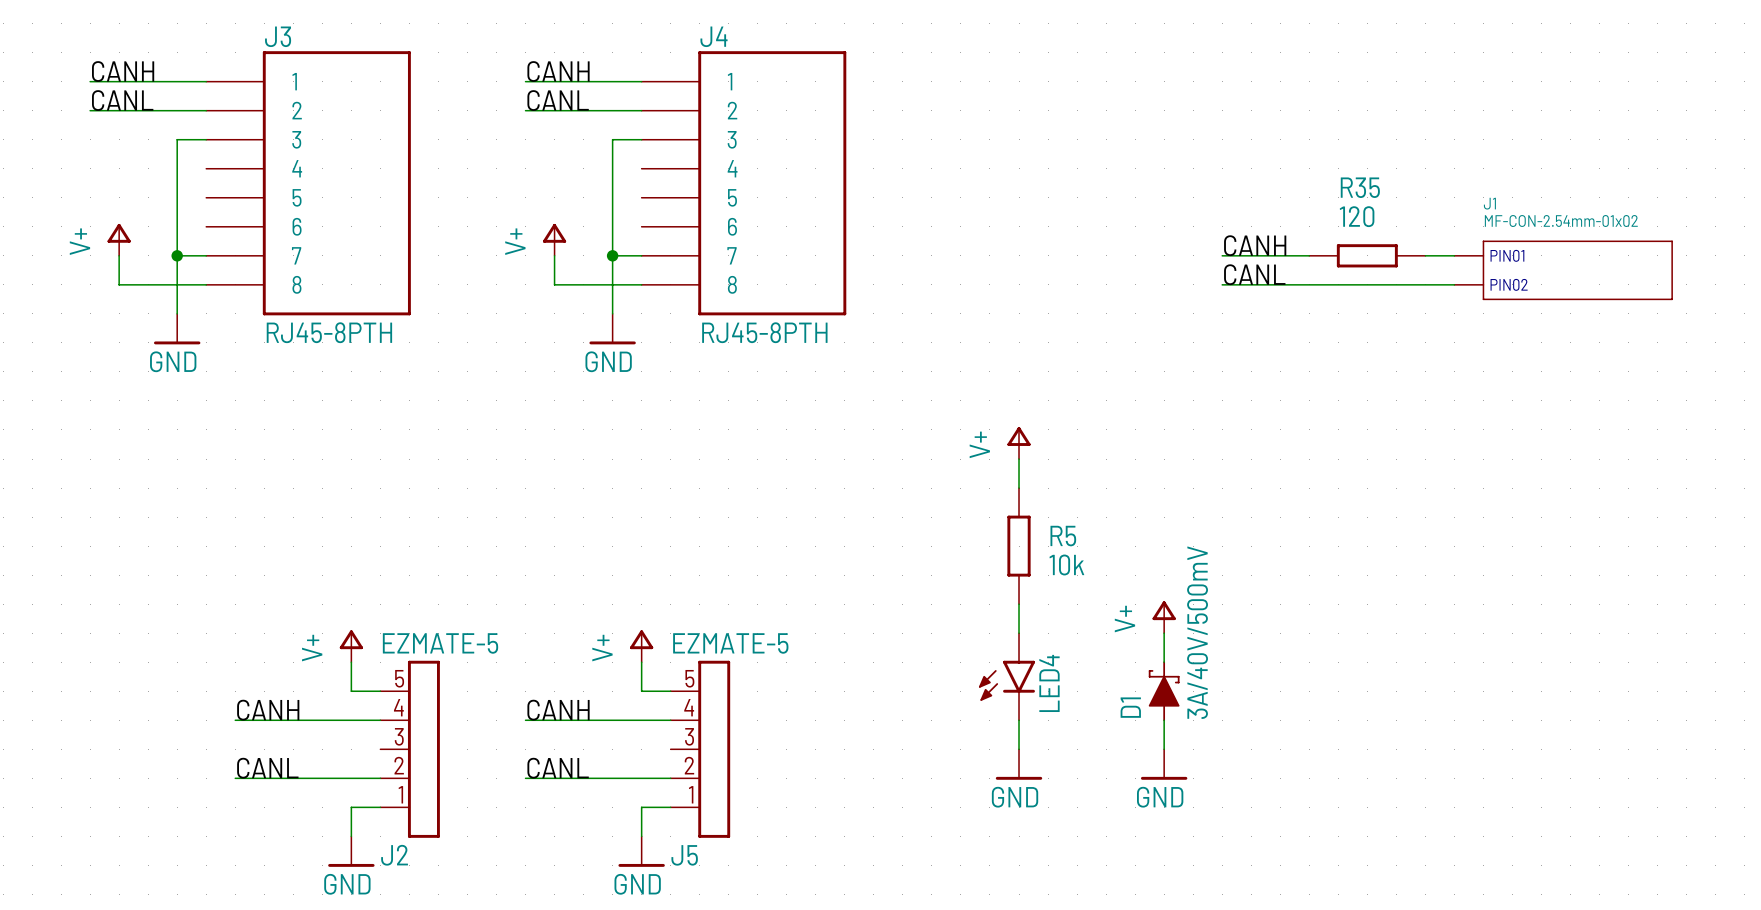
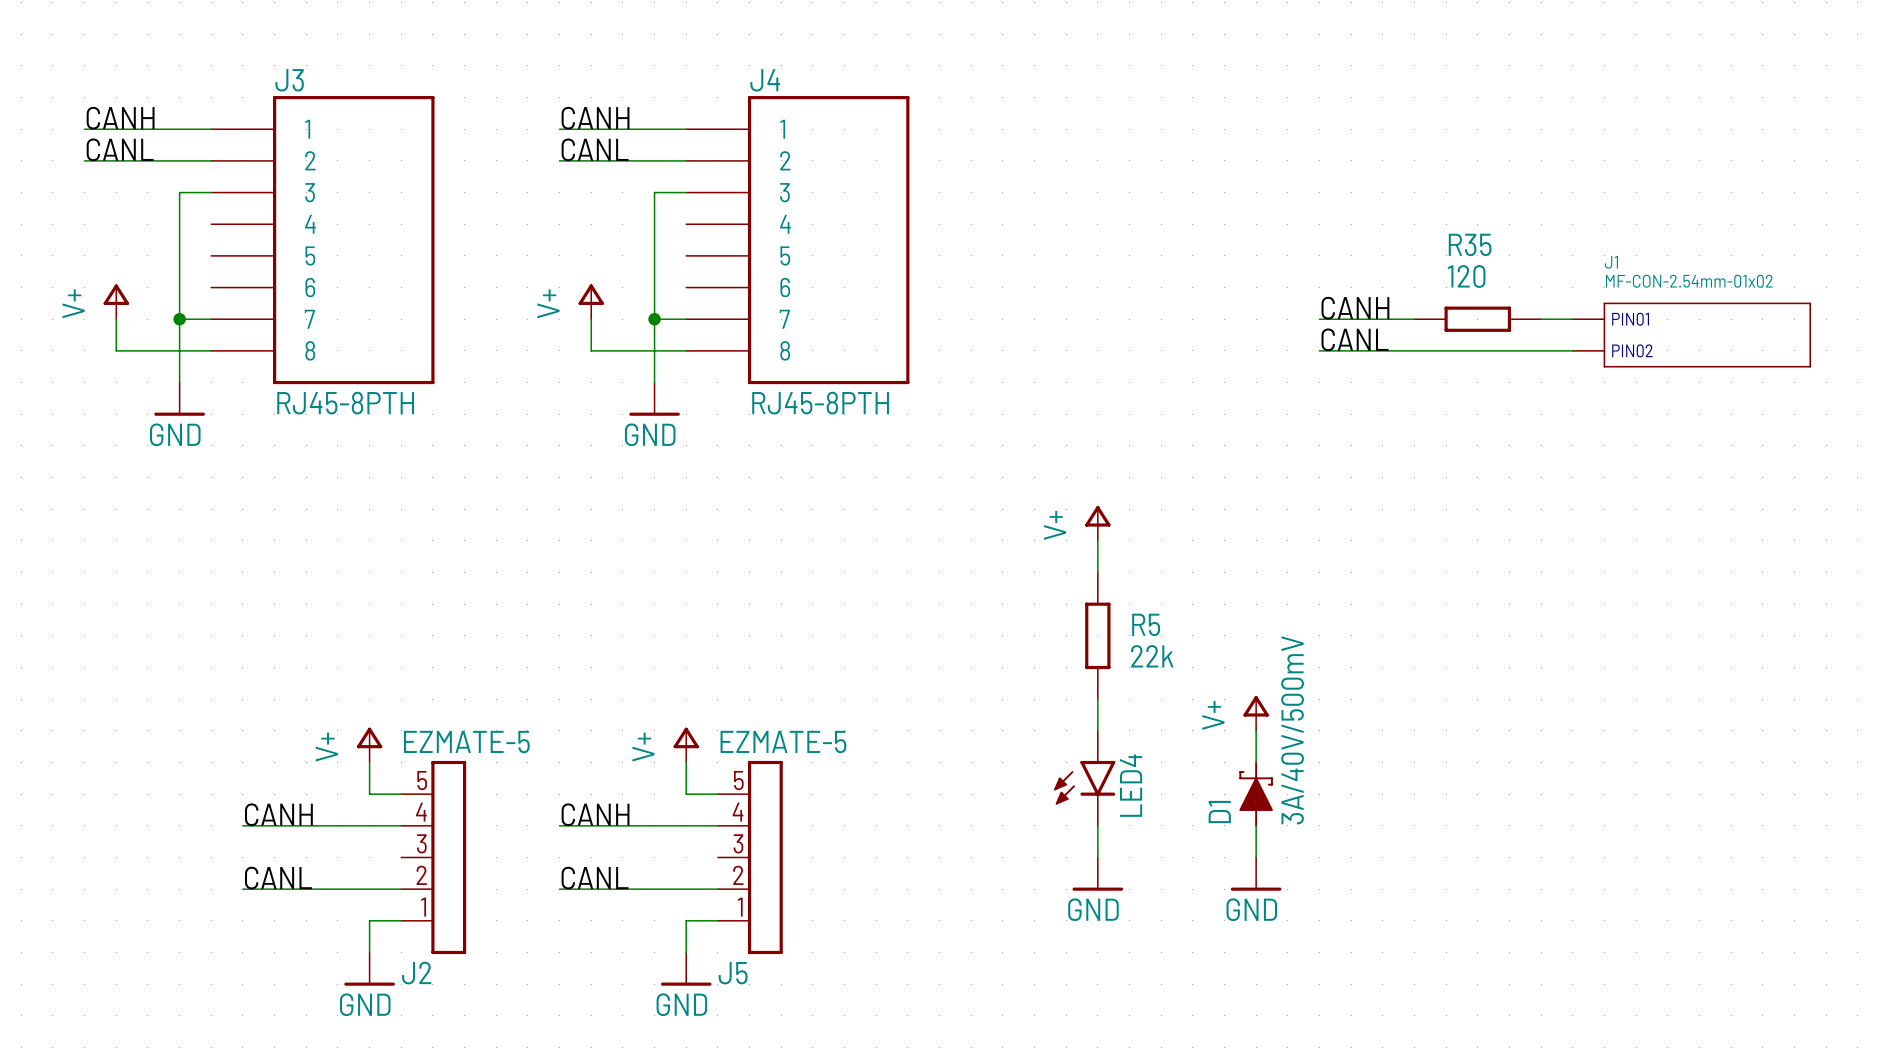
R5 value: 10k (1066, 564) -> 22k (1152, 656)

